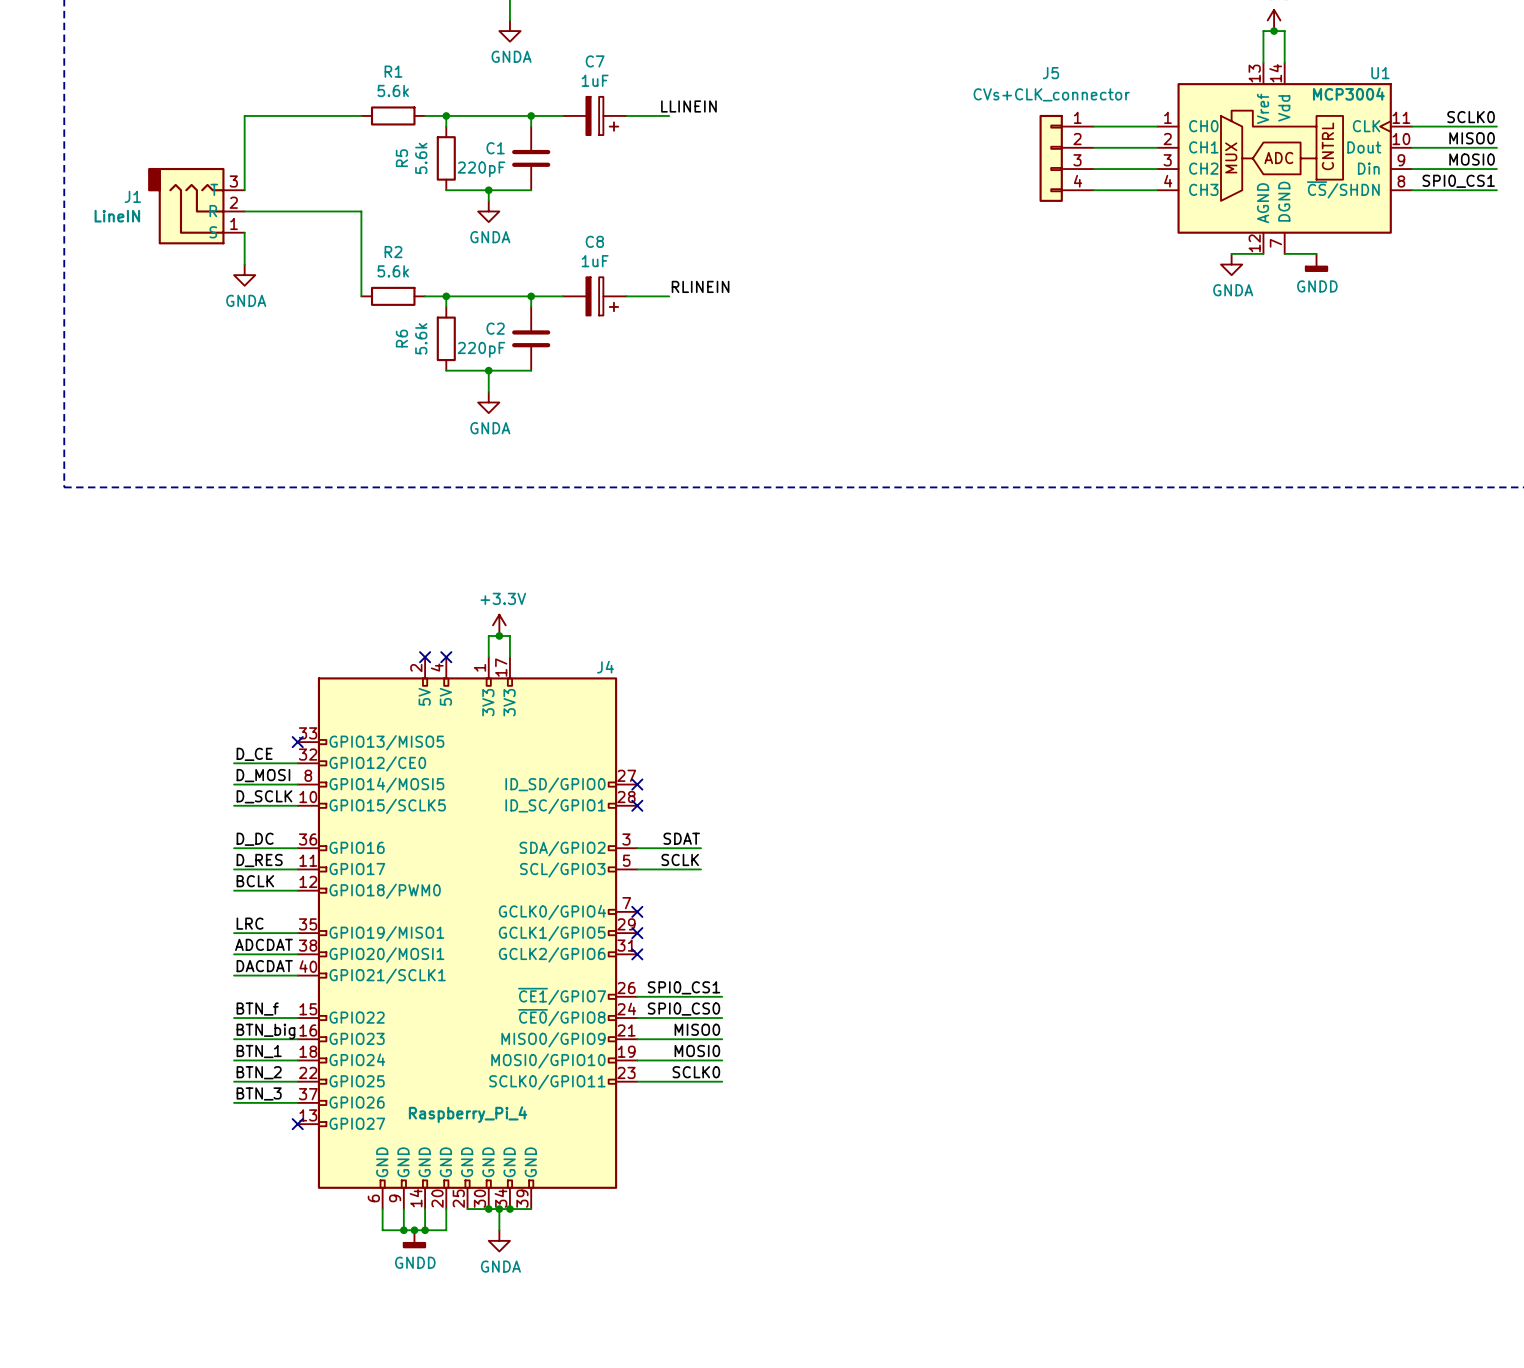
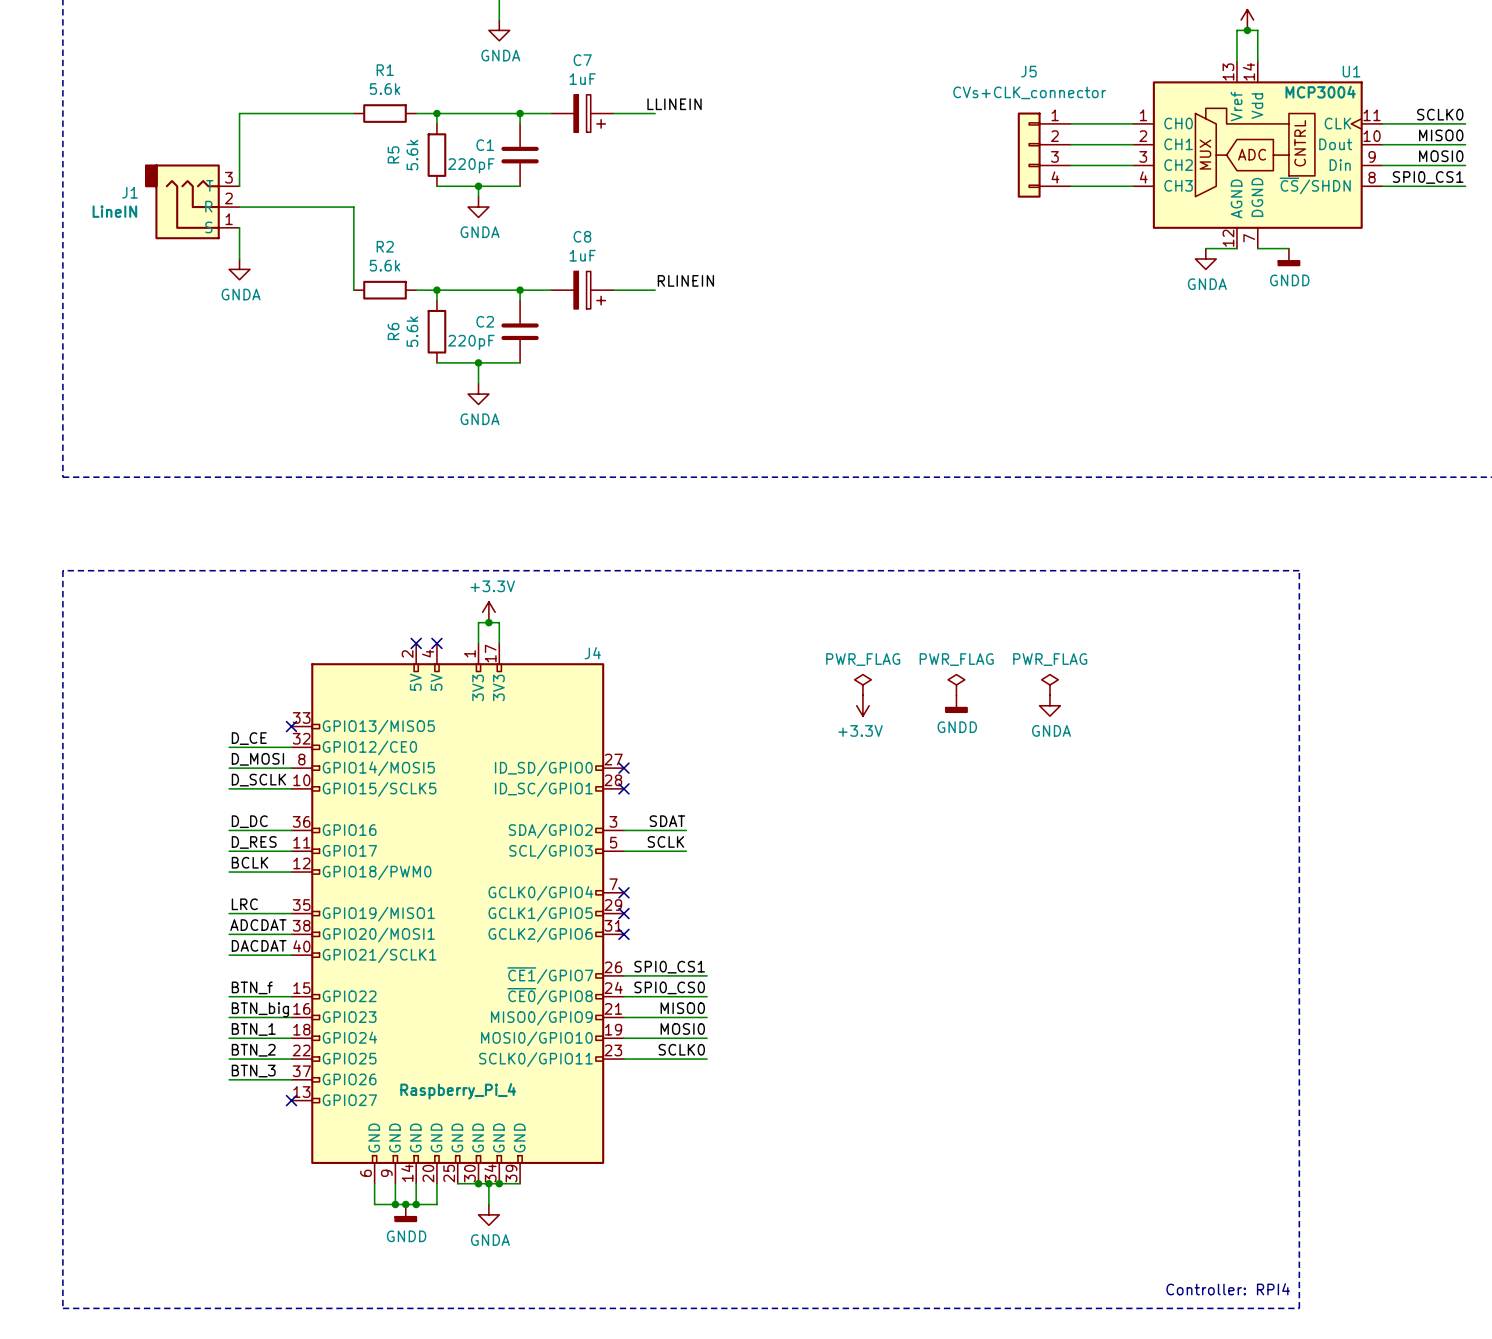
line: none -> (62, 570) (62, 1308) (1299, 1308) (1299, 570) (62, 570)
power symbol: none -> PWR_FLAG (862, 684)
power symbol: none -> PWR_FLAG (956, 684)
power symbol: none -> PWR_FLAG (1049, 684)
power symbol: none -> GNDD (956, 704)
power symbol: none -> +3.3V (862, 705)
power symbol: none -> GNDA (1049, 705)
text: none -> Controller: RPI4 (1228, 1289)

